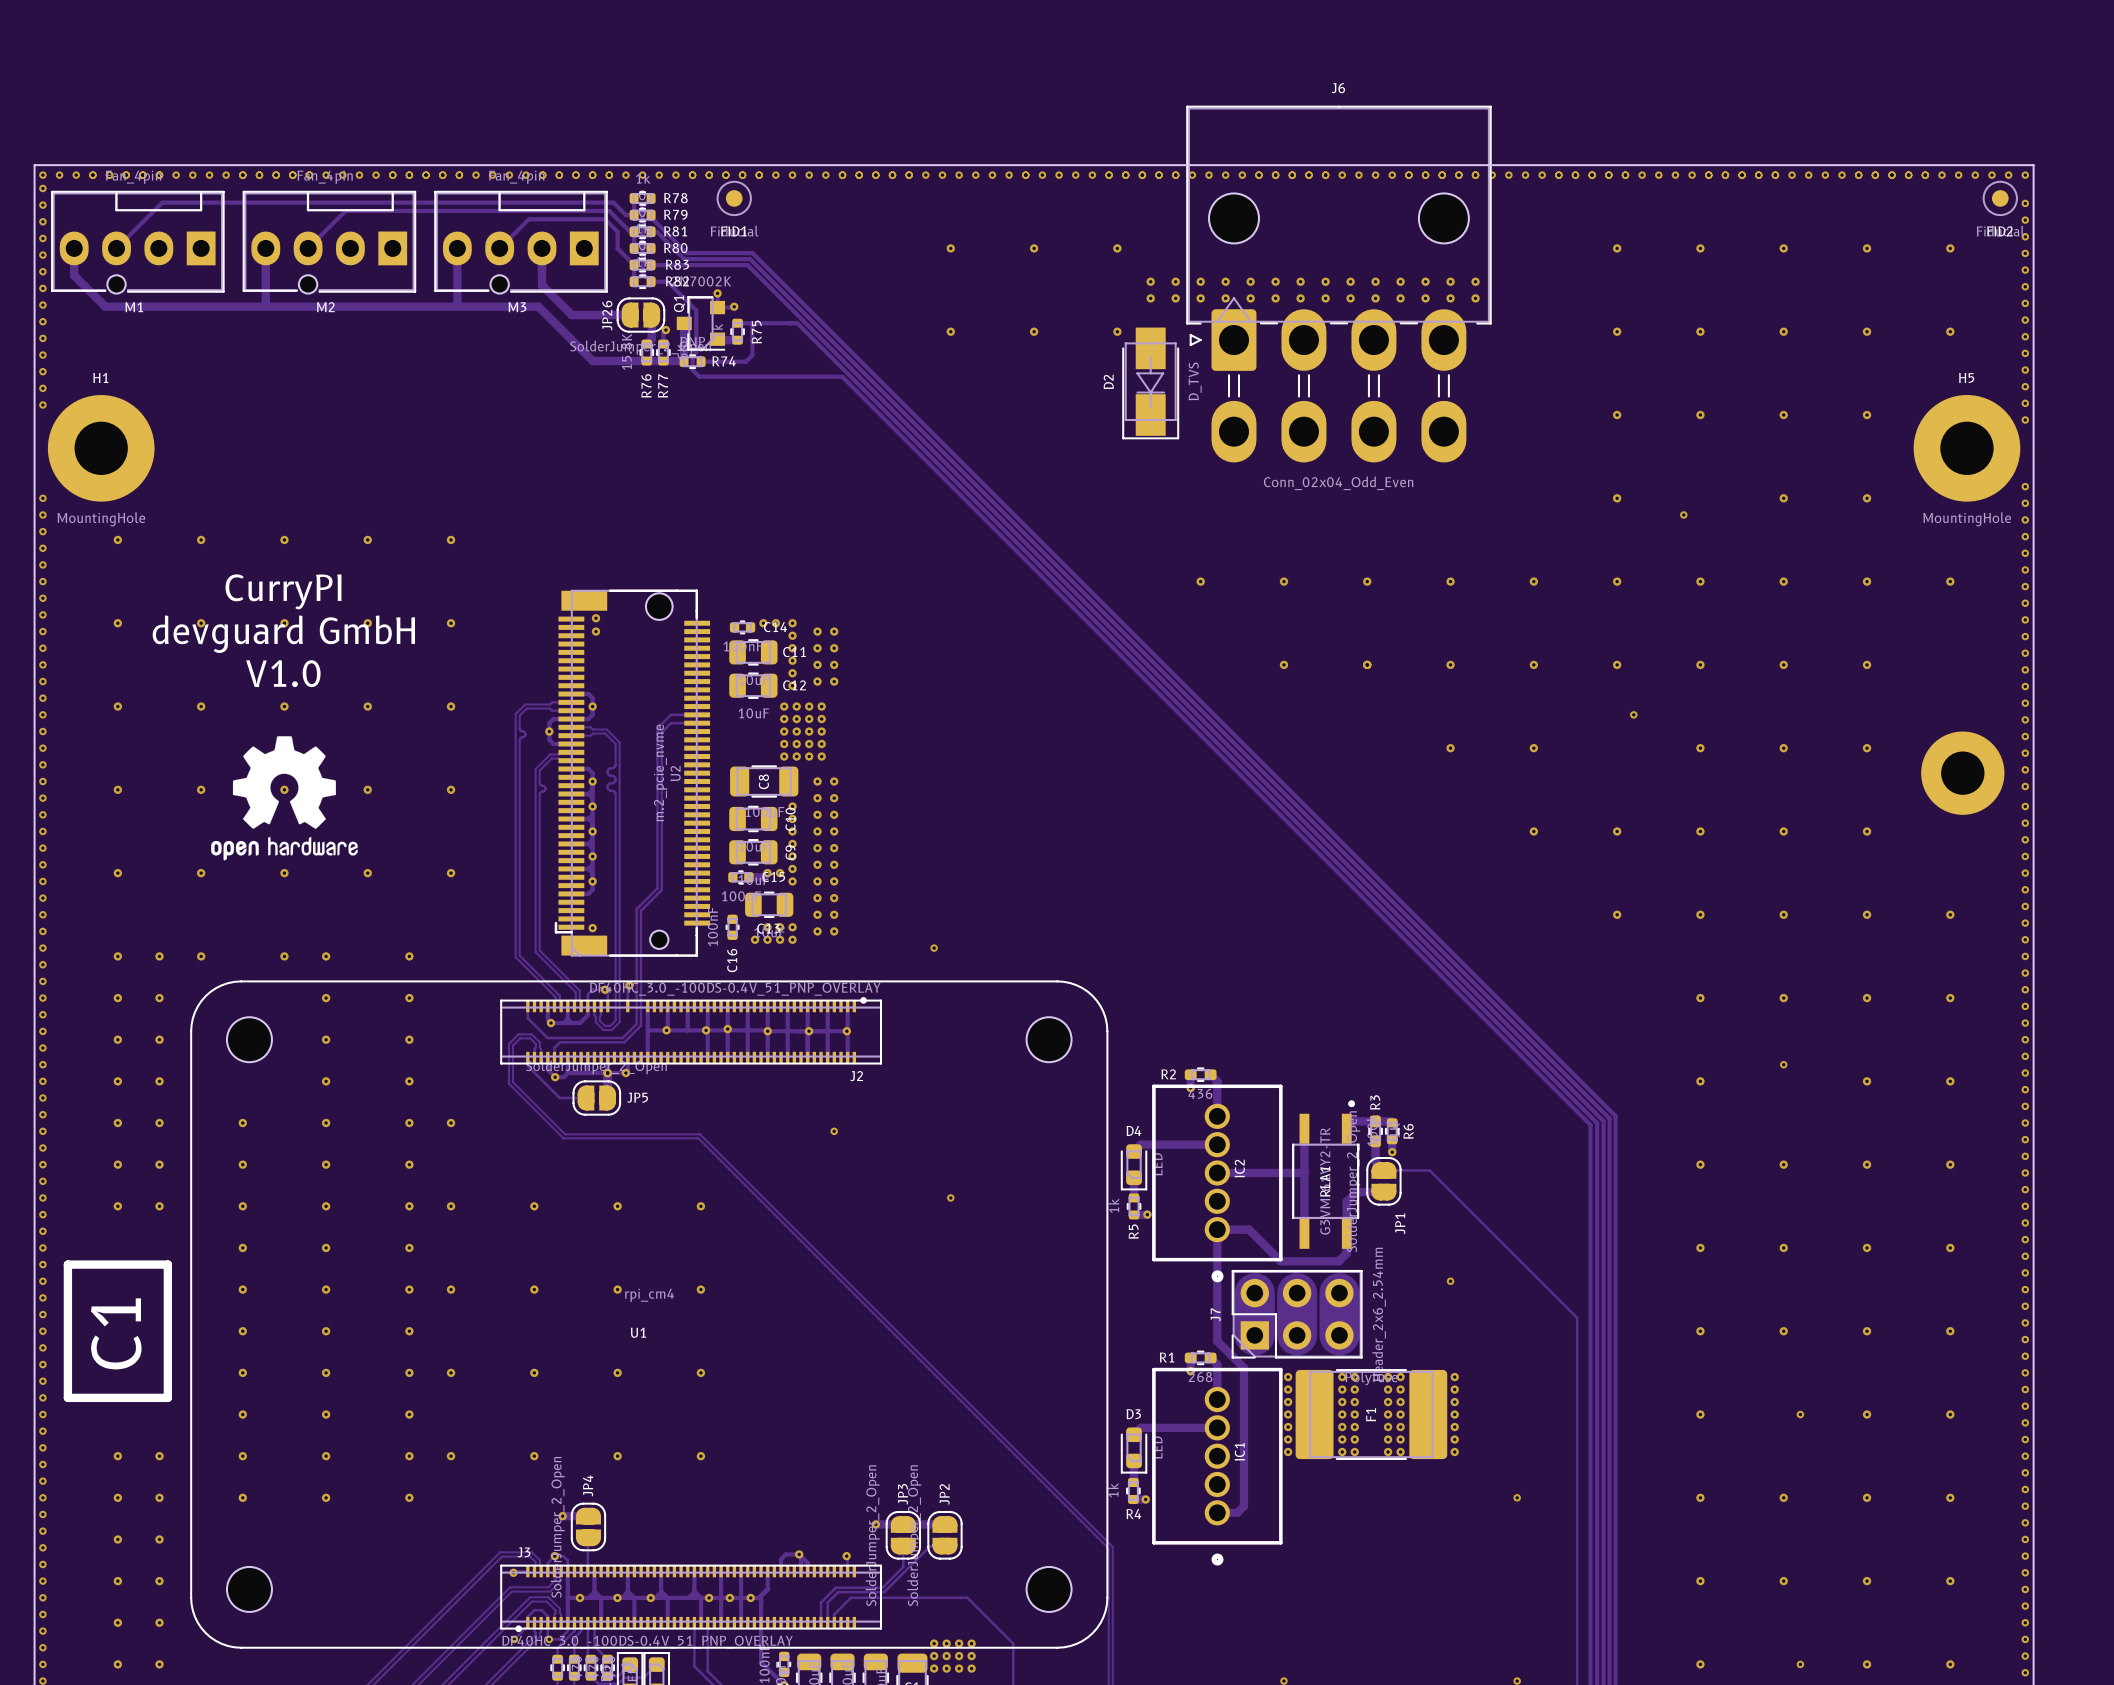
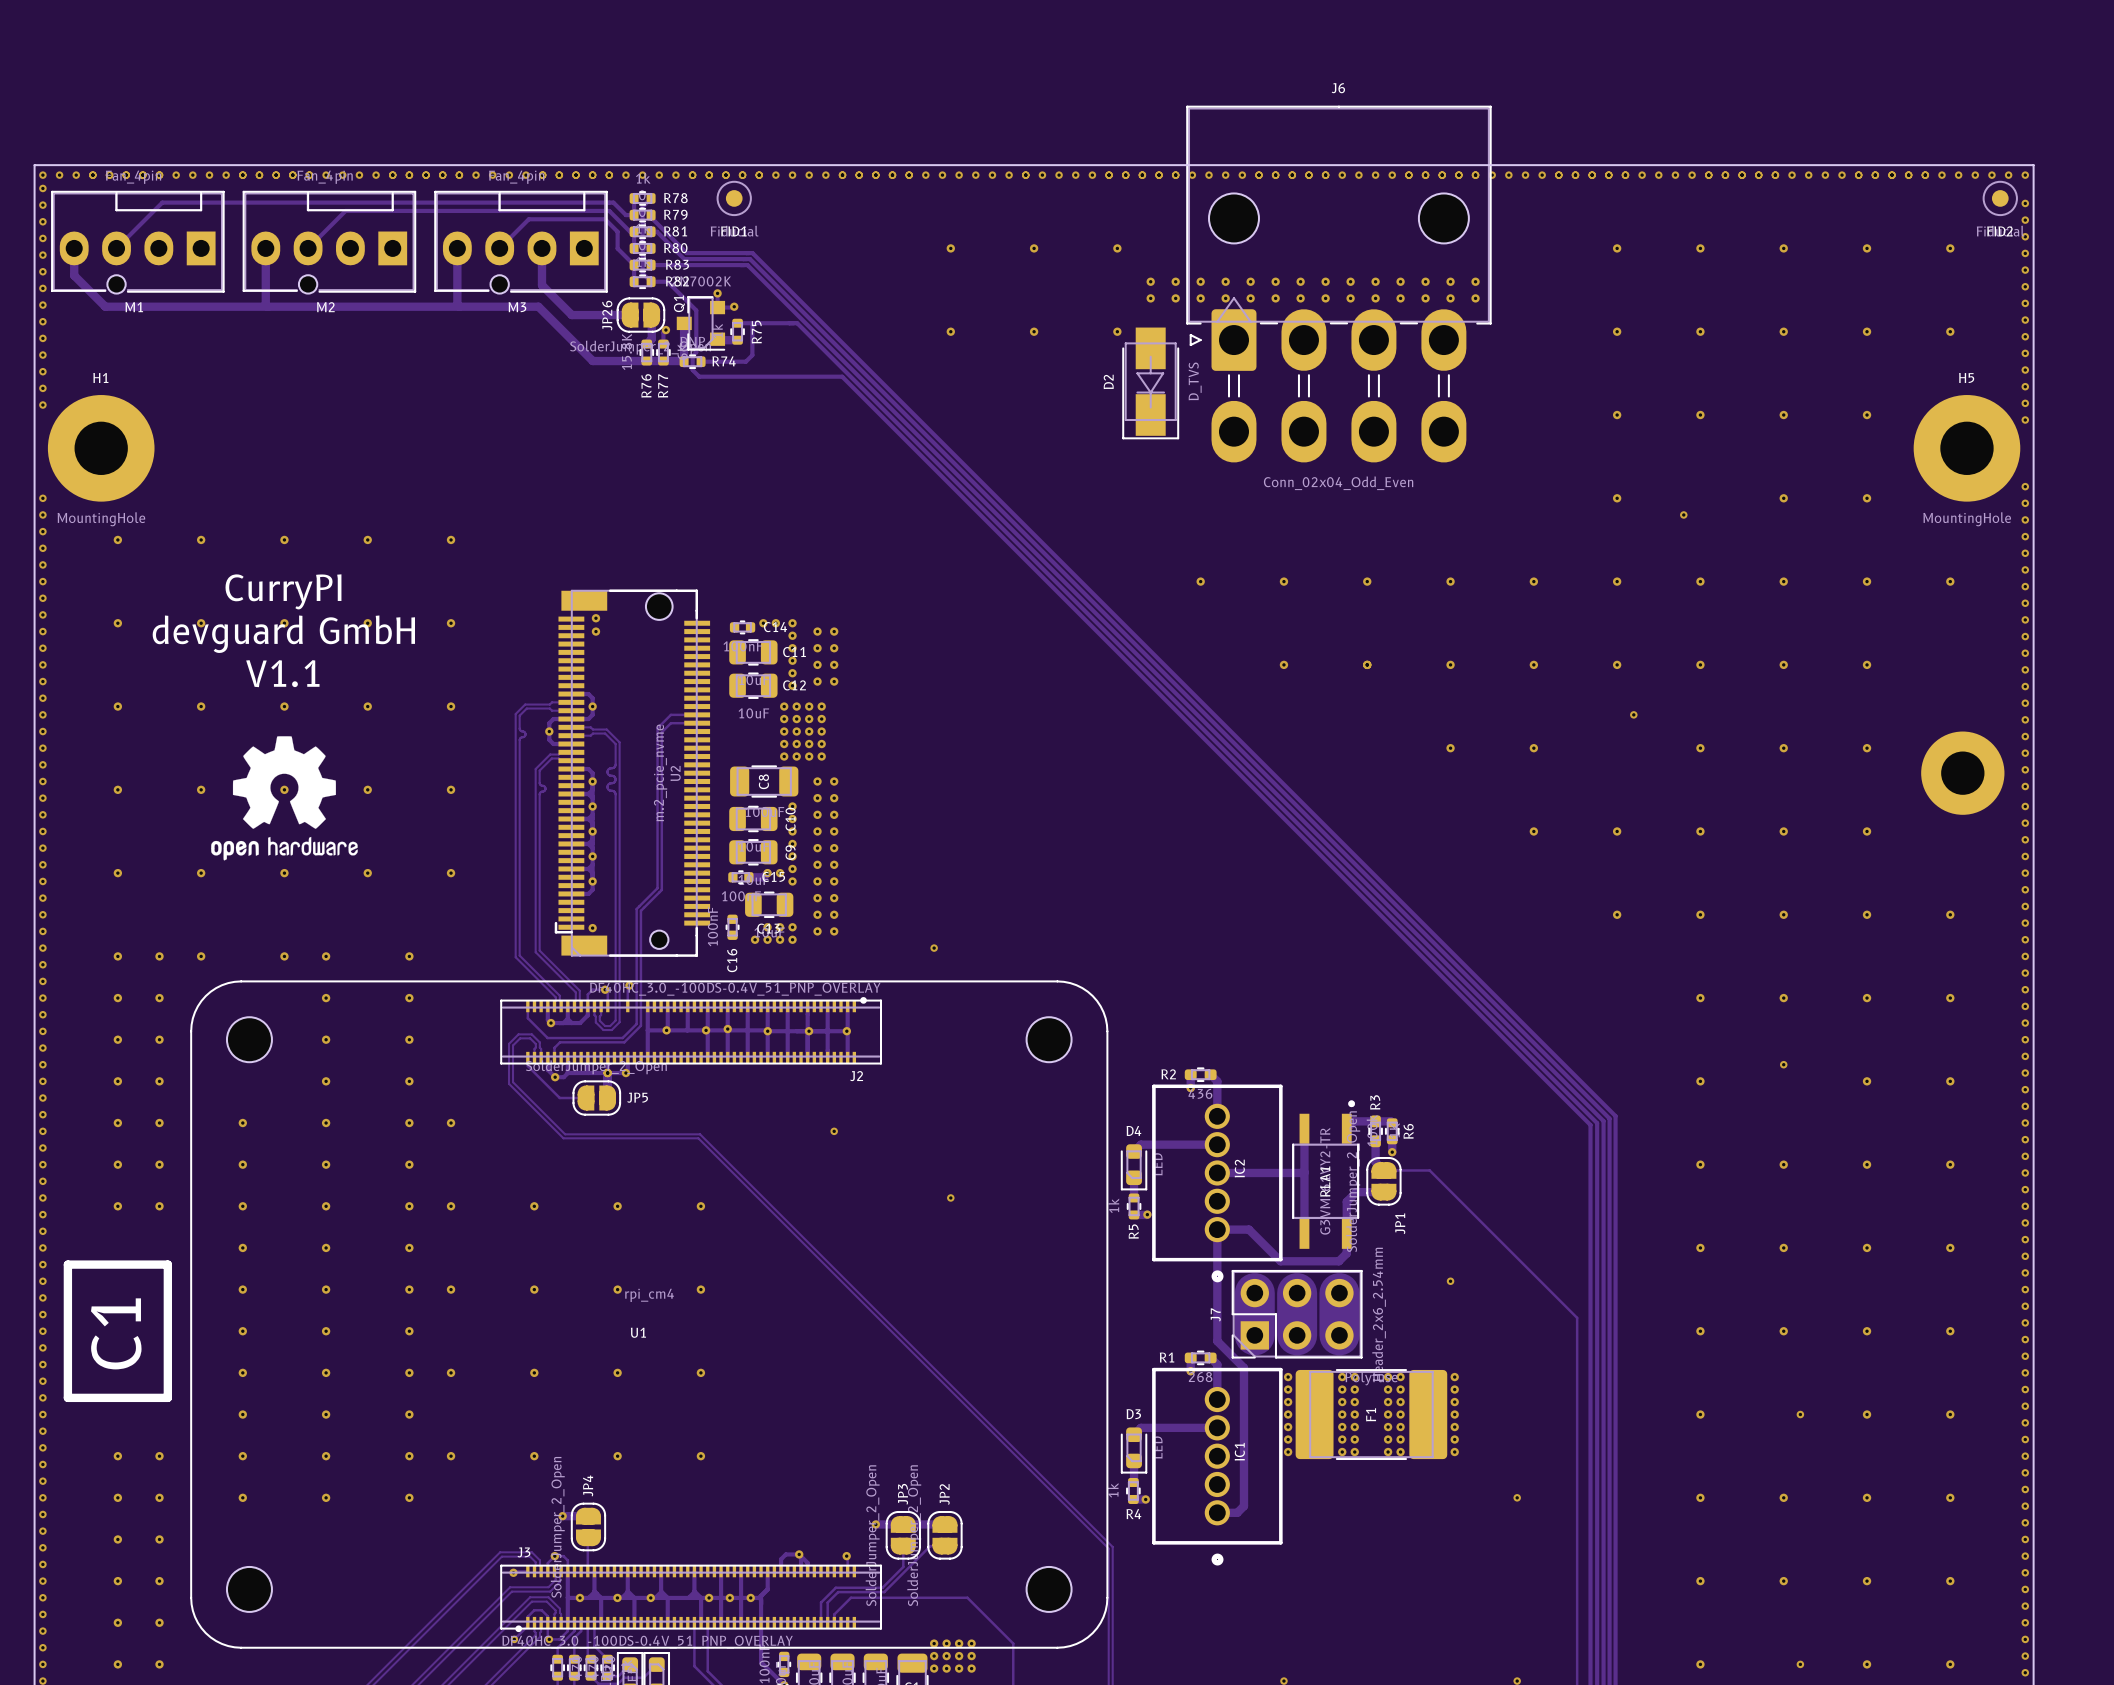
text: V1.0 (283, 673) -> V1.1 (282, 673)

